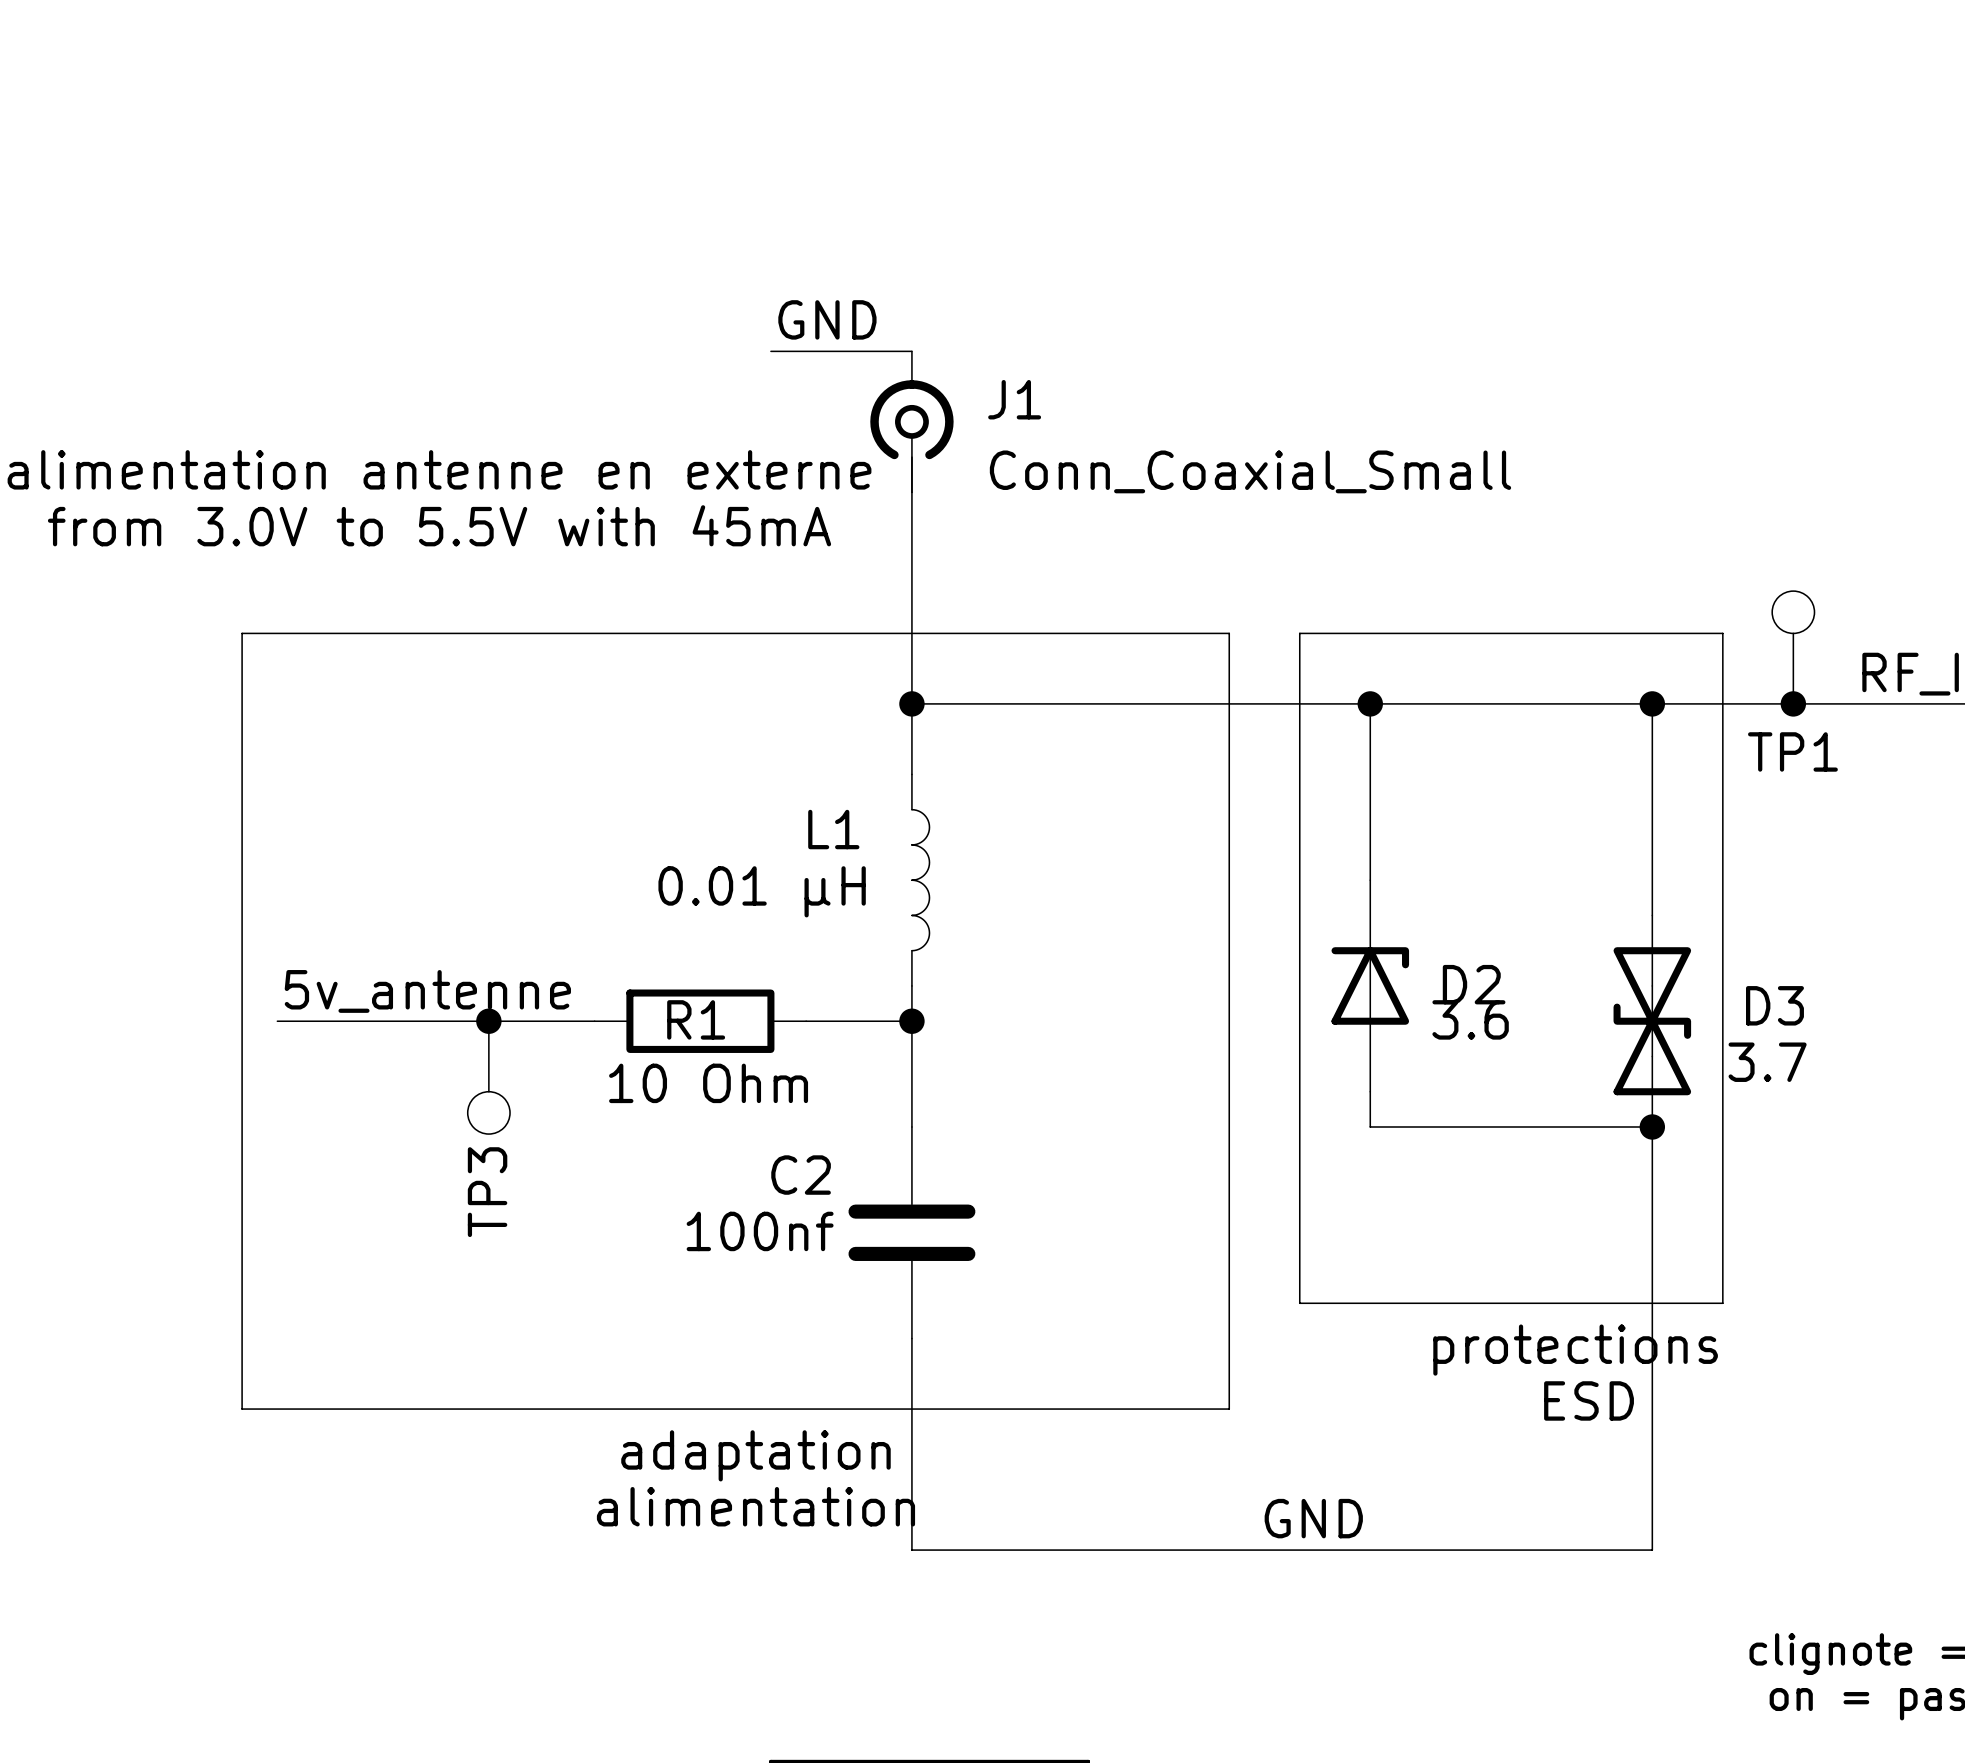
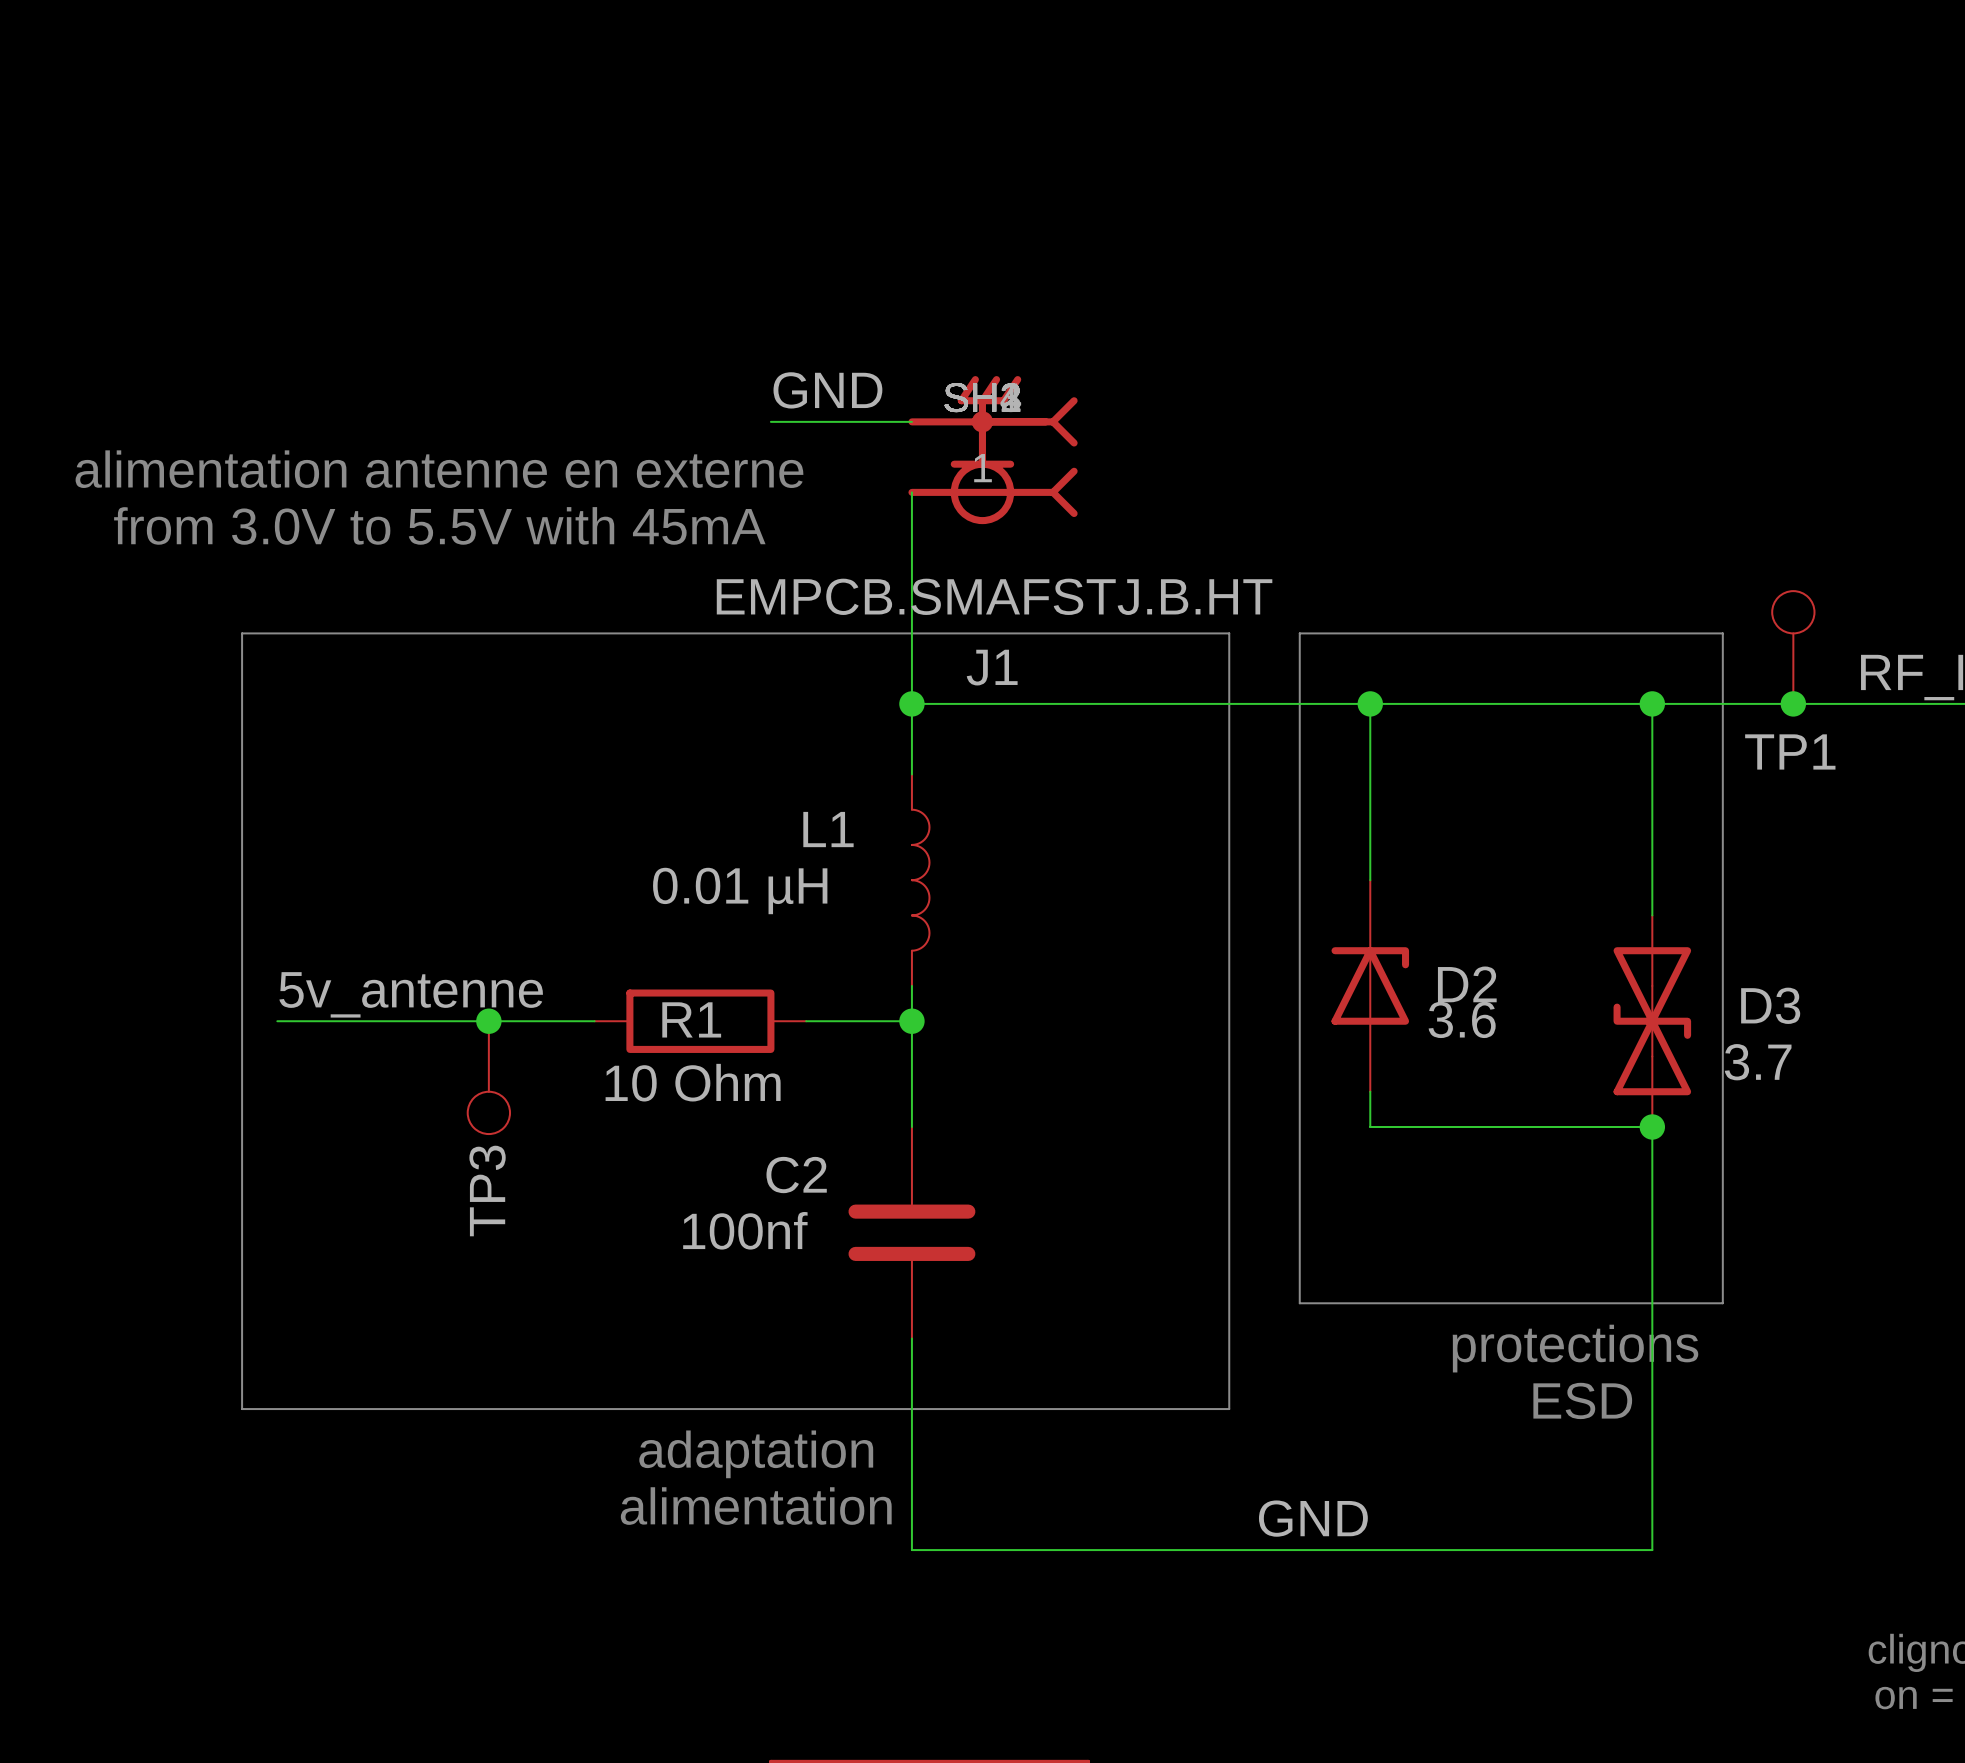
label position: GND (827, 319) -> GND (827, 390)
wire: (770, 351) (911, 351) -> (770, 421) (911, 421)
J1 symbol: [870, 351, 954, 493] -> [908, 376, 1078, 525]
J1 name position: J1 (1014, 399) -> J1 (992, 667)
J1 value: Conn_Coaxial_Small (1250, 471) -> EMPCB.SMAFSTJ.B.HT (994, 596)

